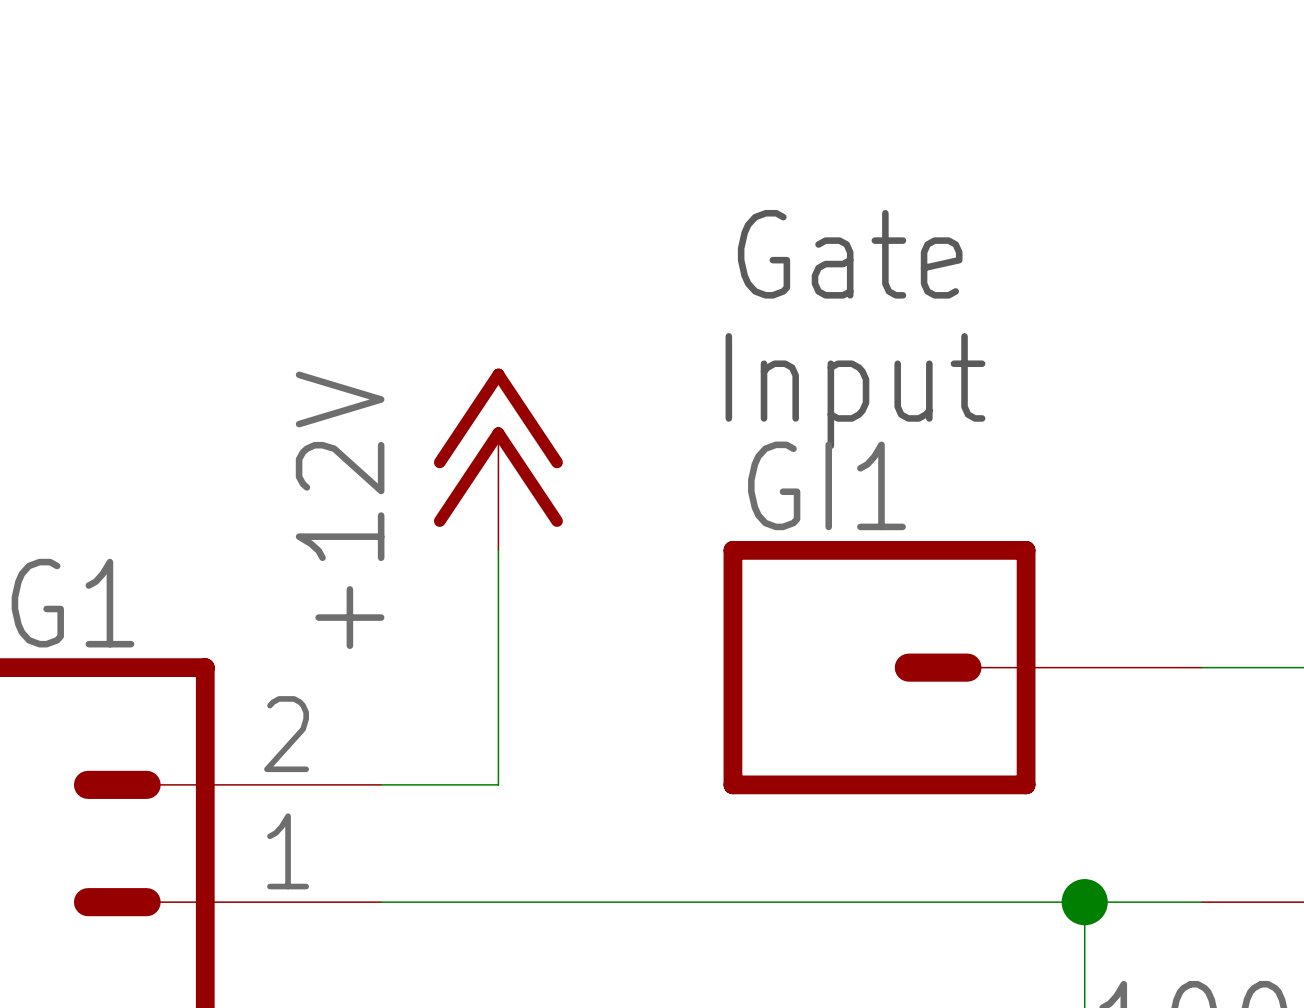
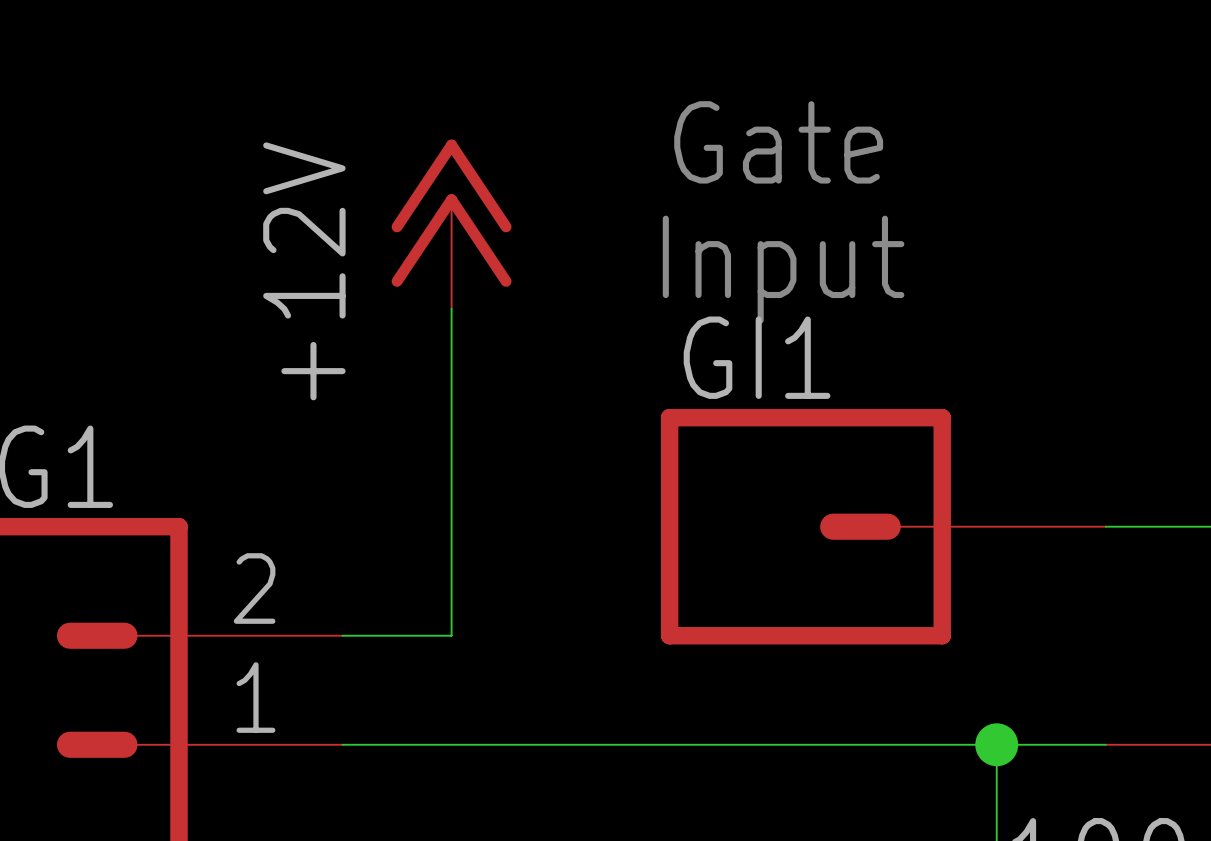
power symbol position: +12V (498, 459) -> +12V (451, 224)

